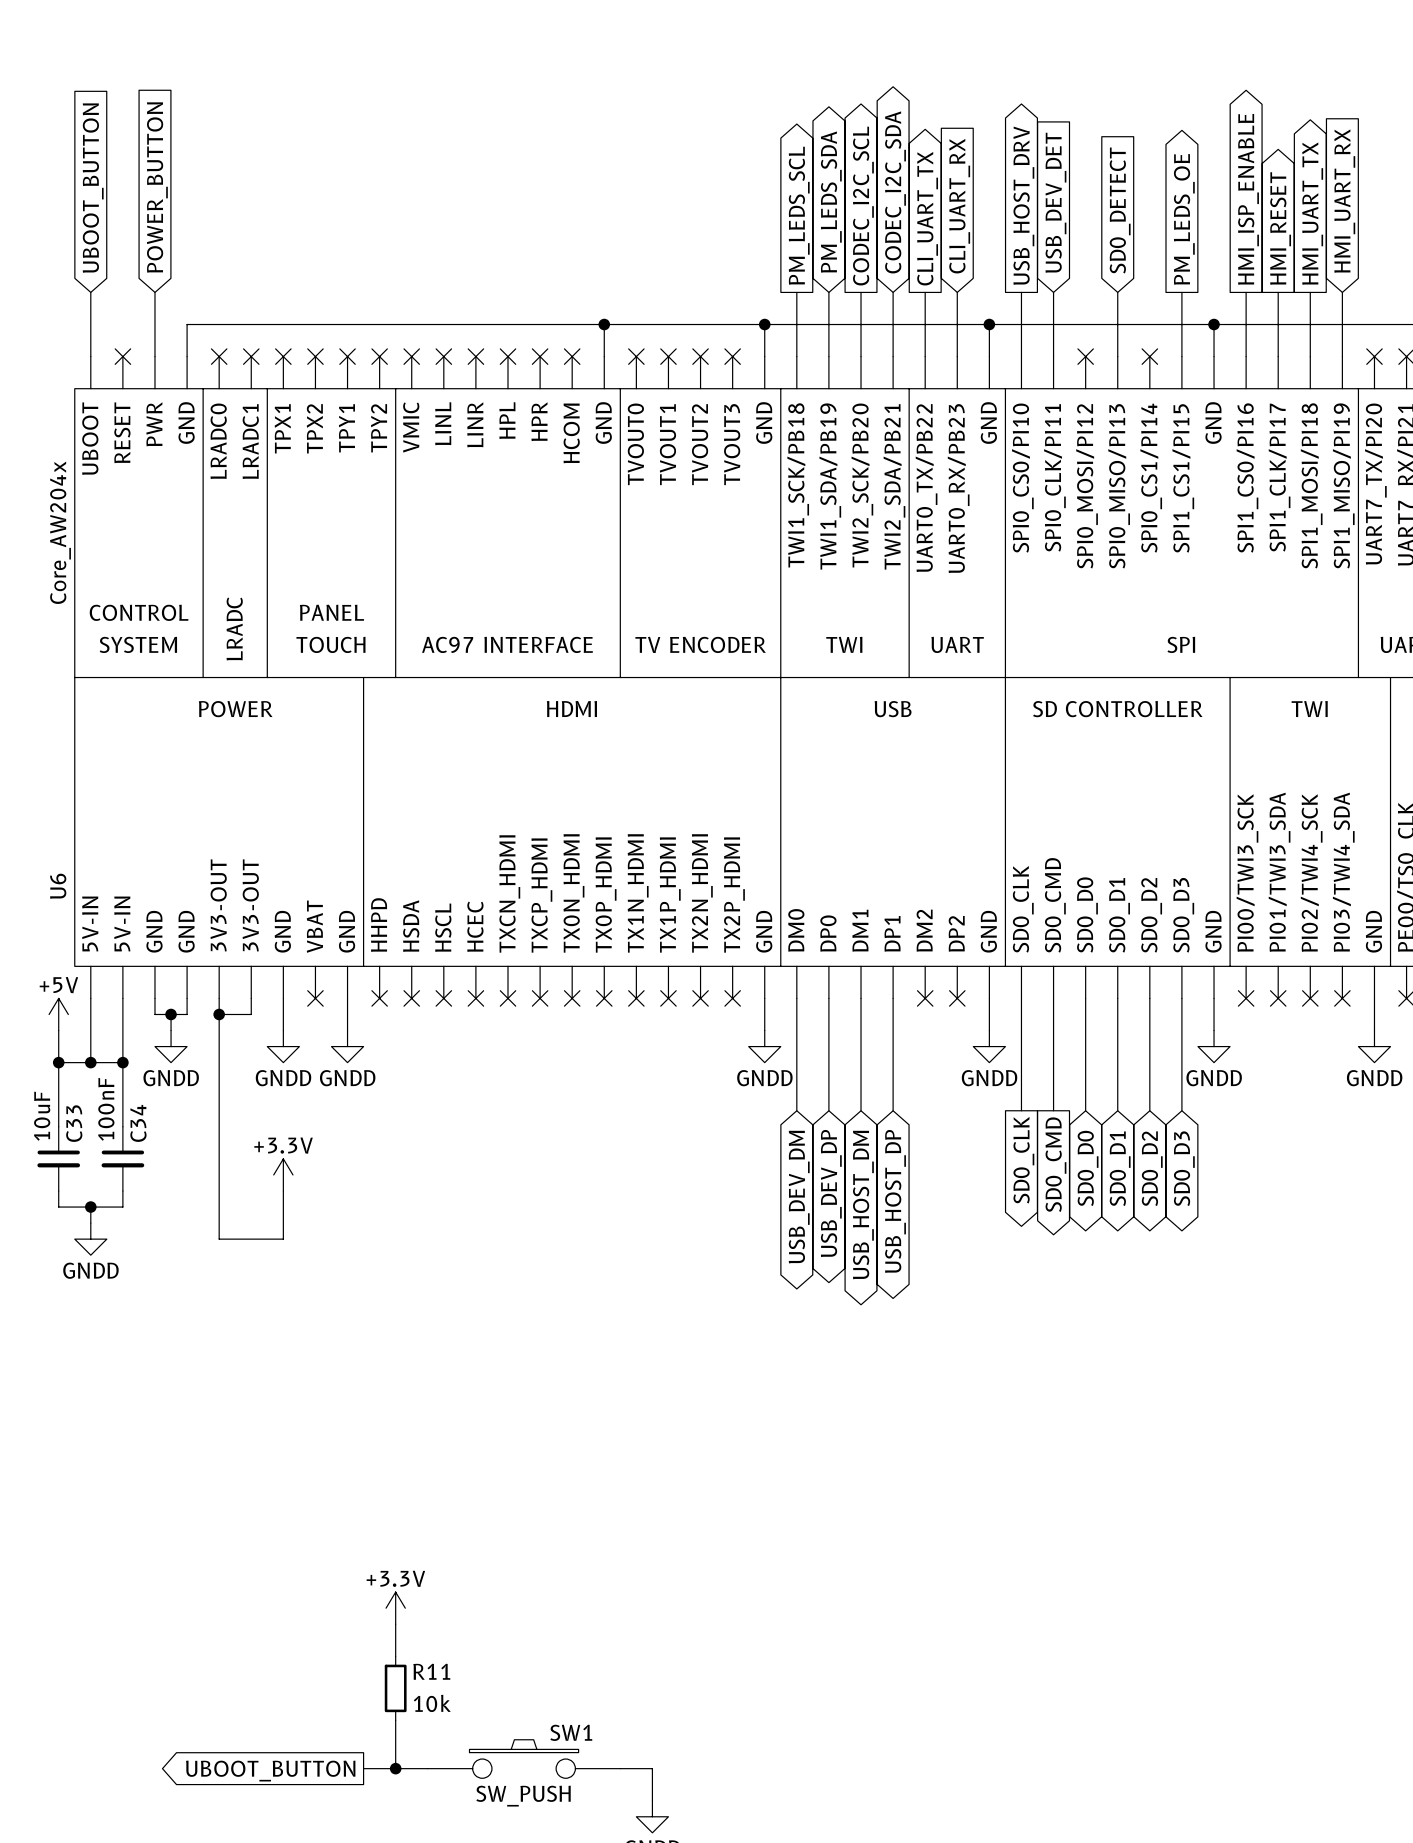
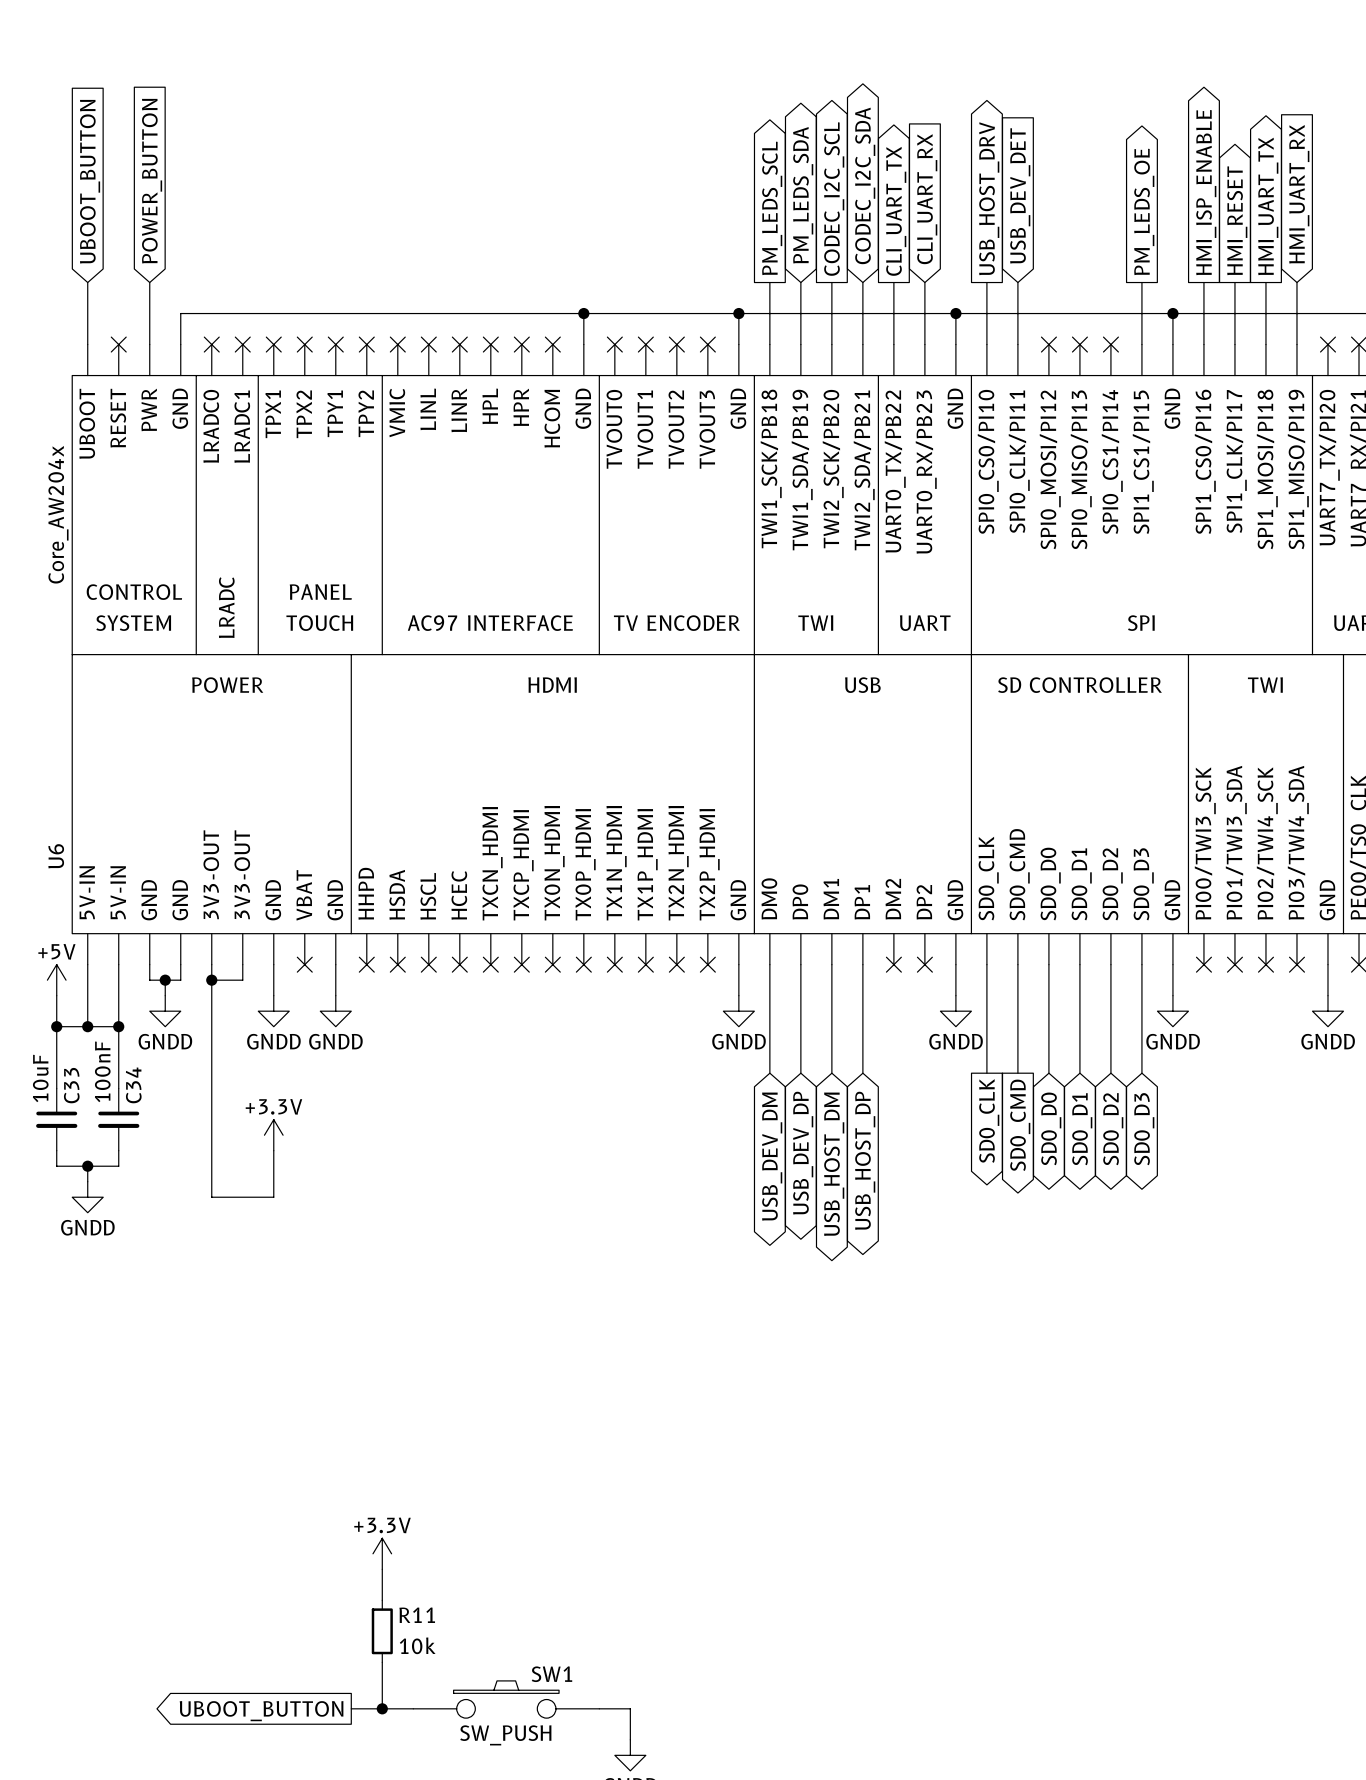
global label: SD0_DETECT (1120, 210) -> none
wire: (1117, 292) (1117, 356) -> none
no-connect mark: none -> (1079, 344)

